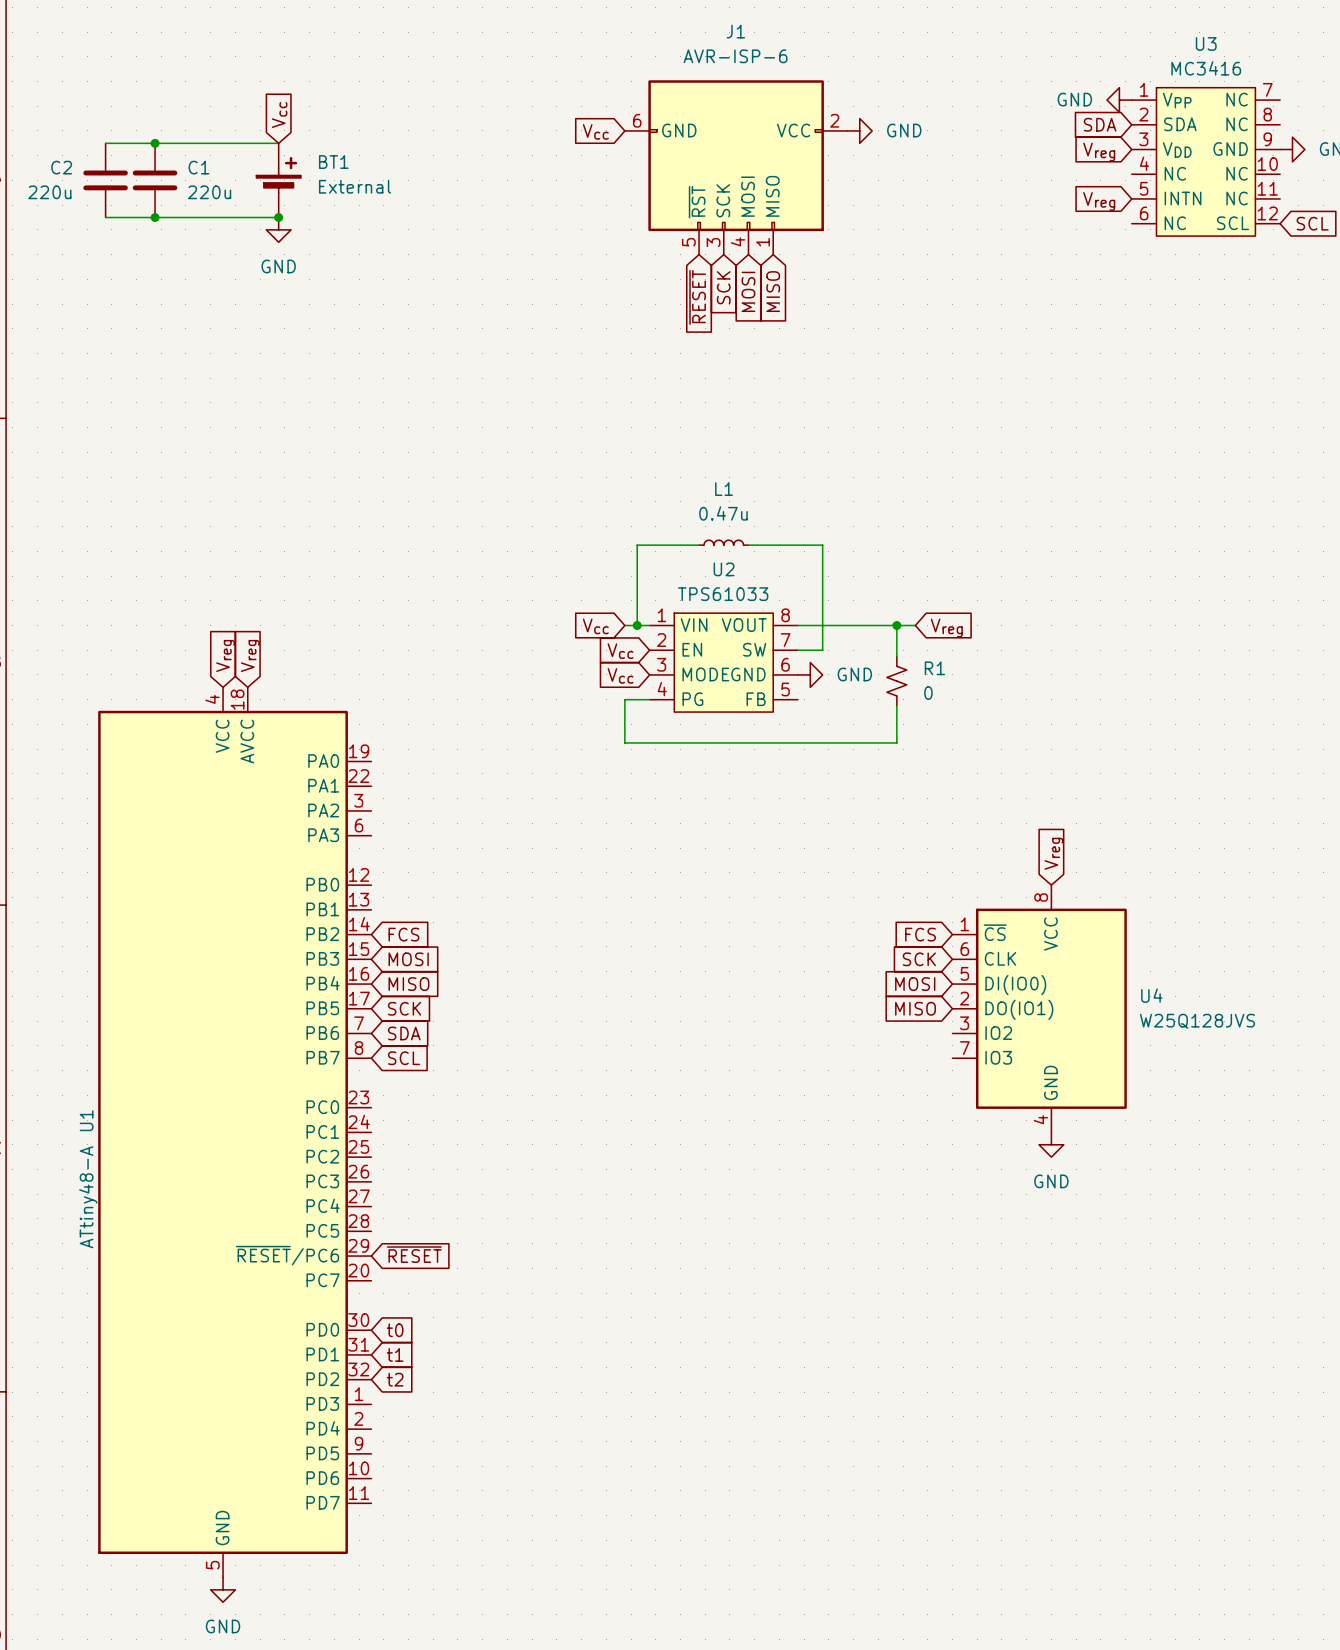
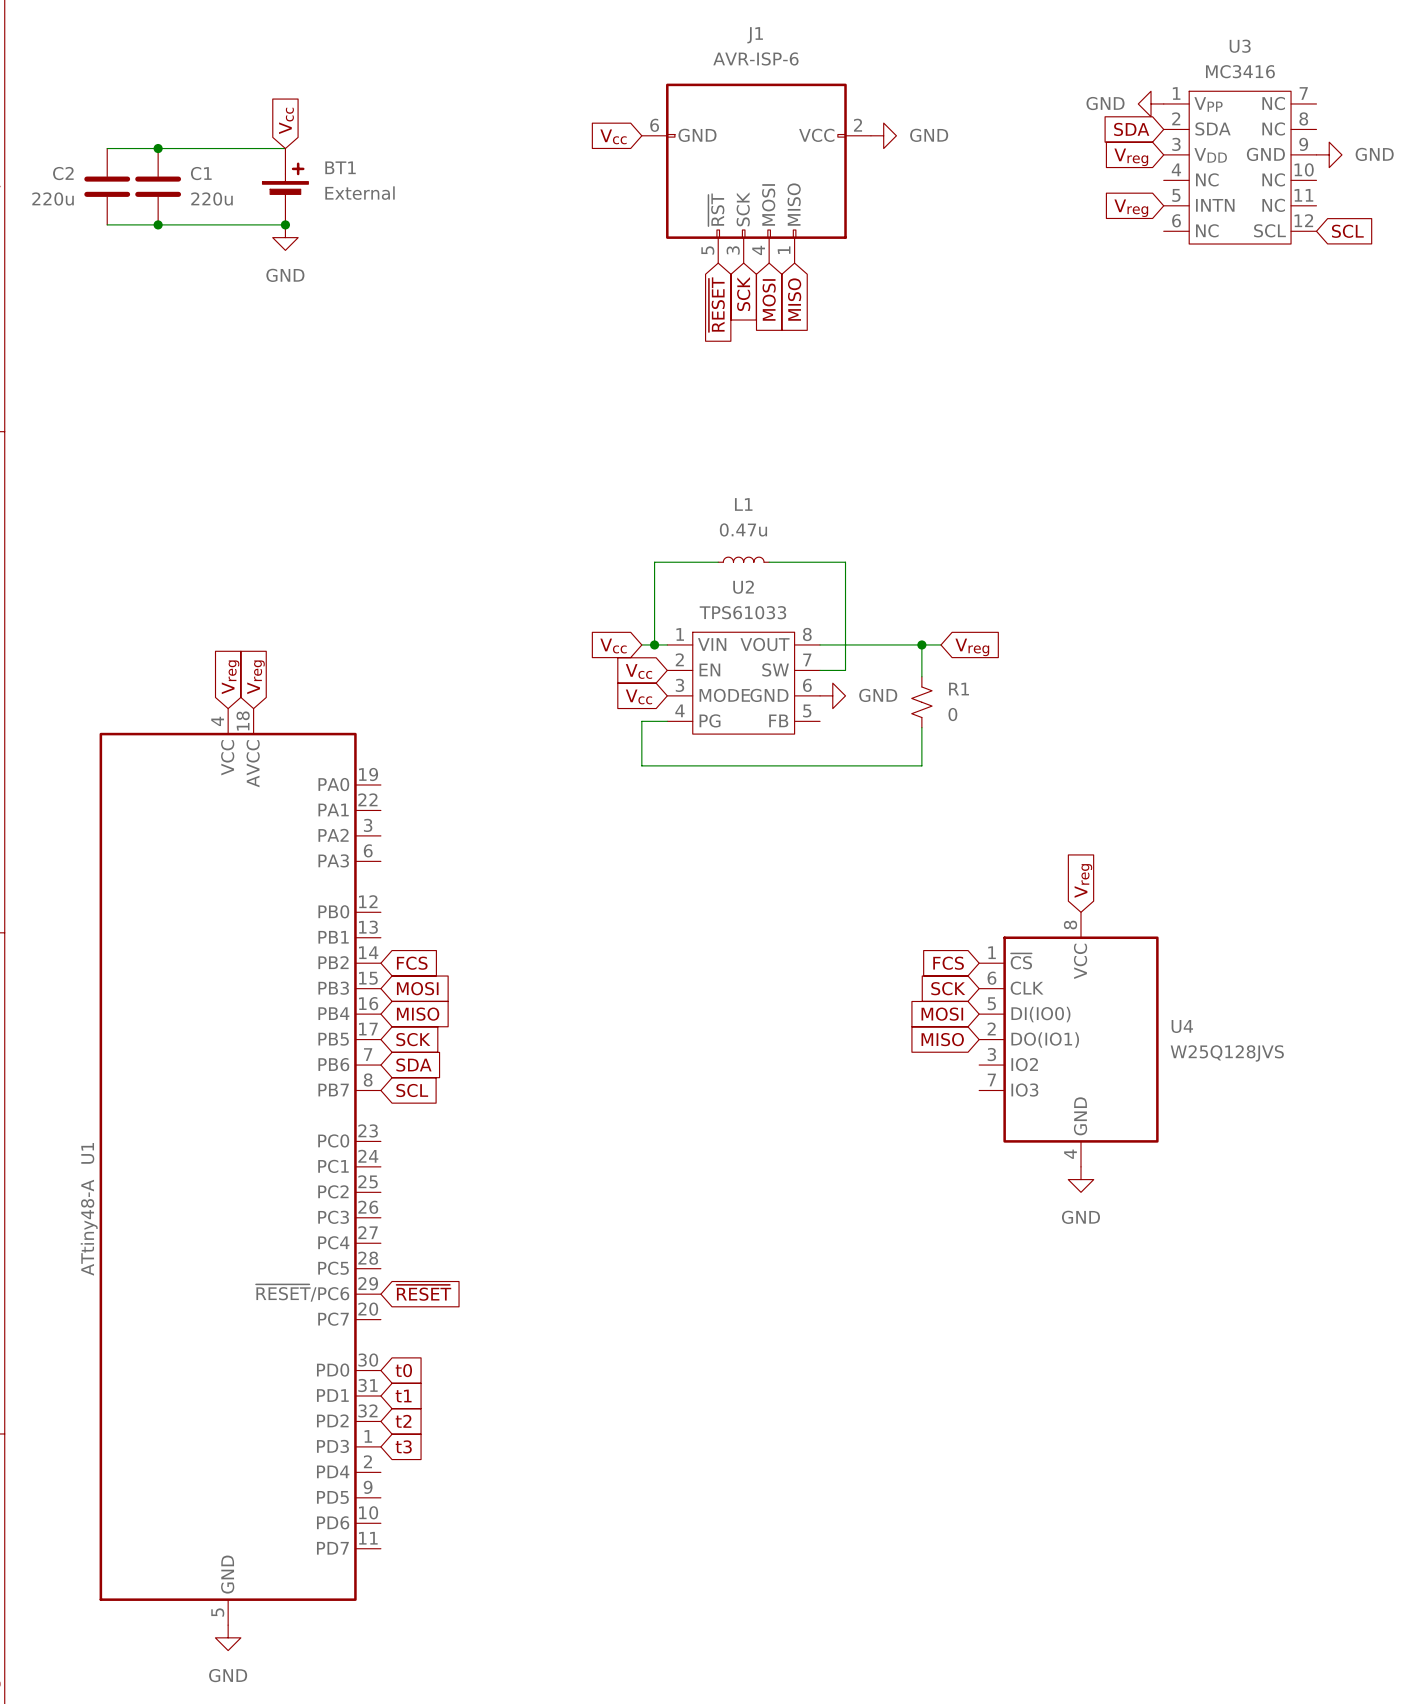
global label: none -> t3 (403, 1446)

